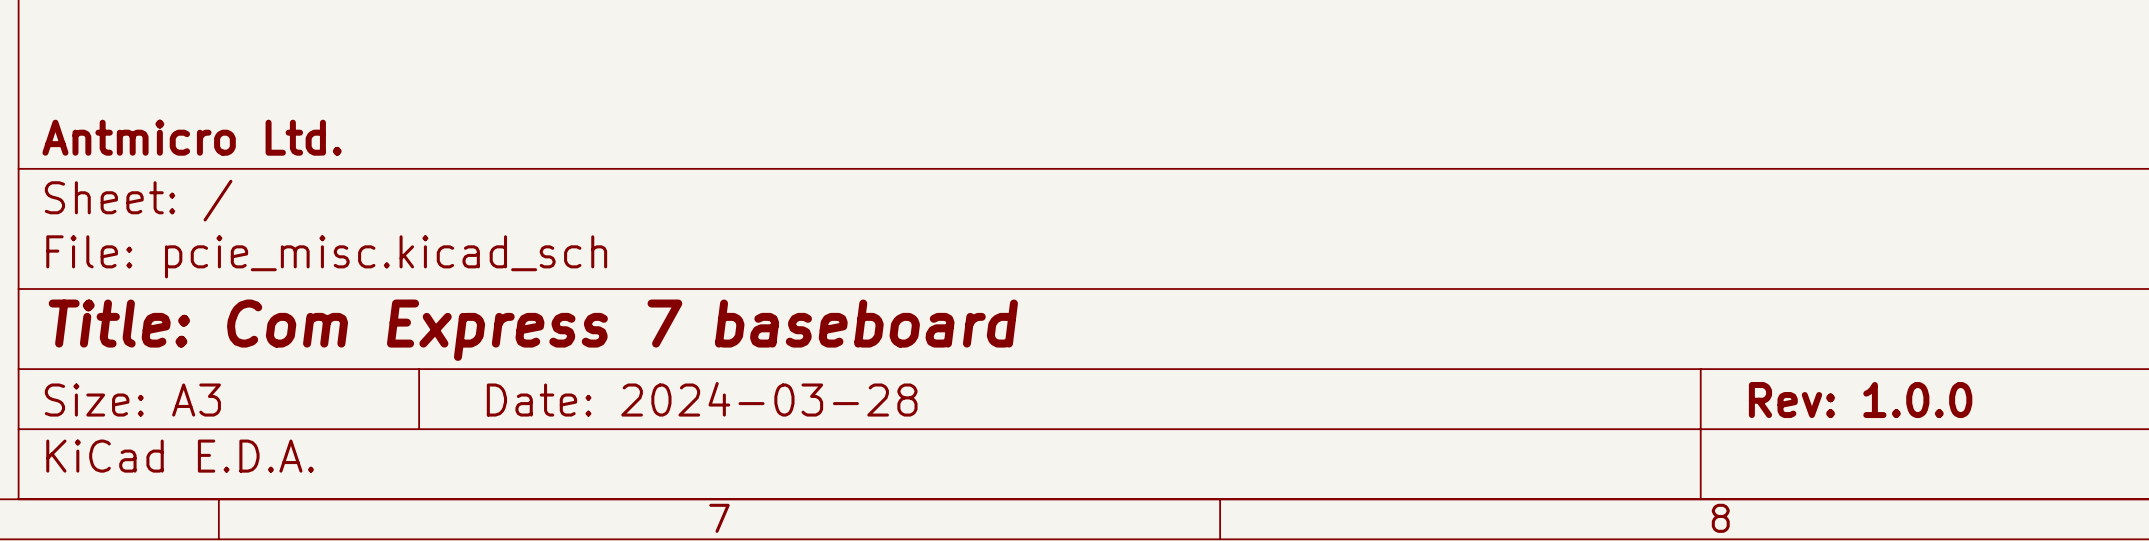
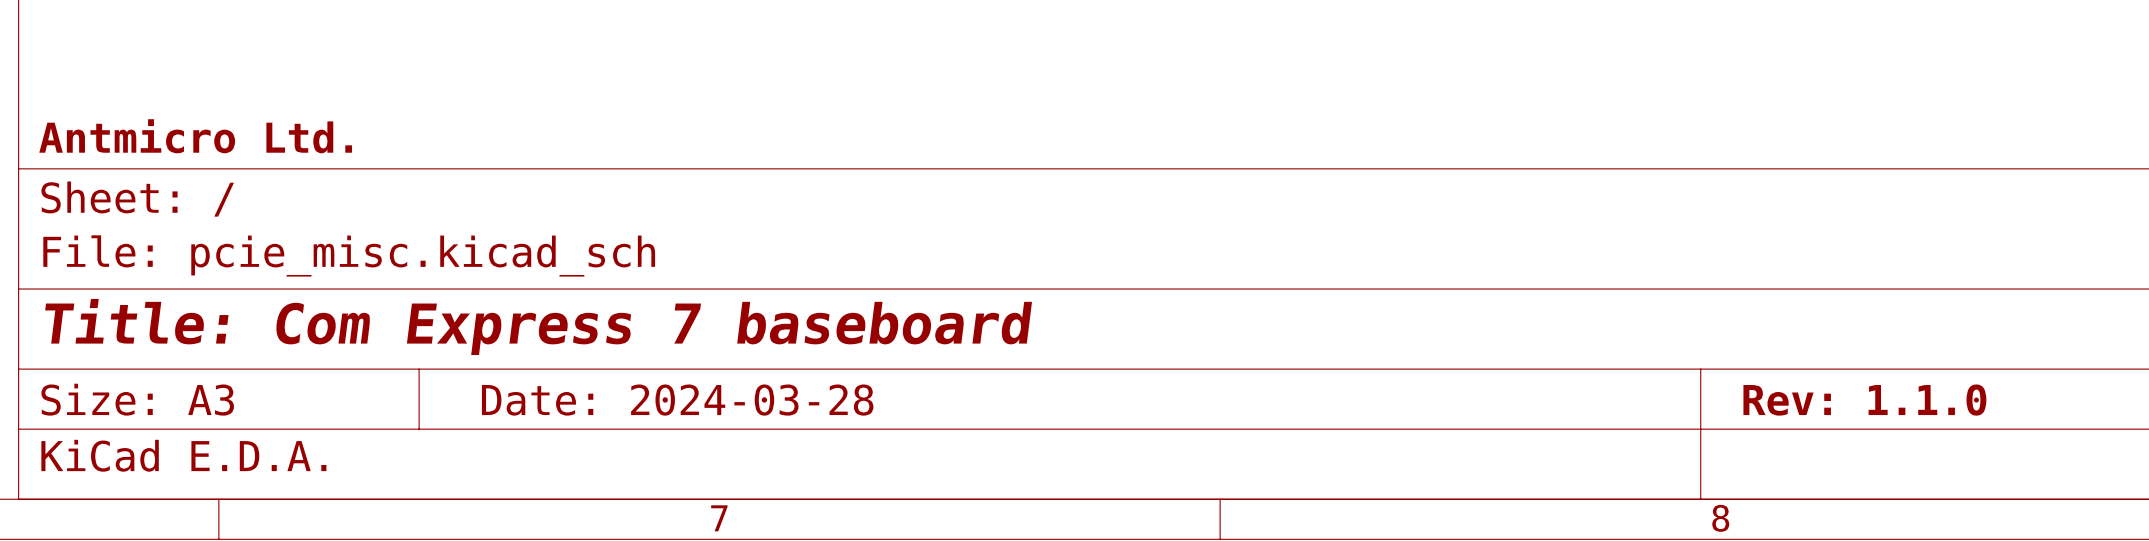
title block: Rev: 1.0.0 (1860, 400) -> Rev: 1.1.0 (1864, 400)

